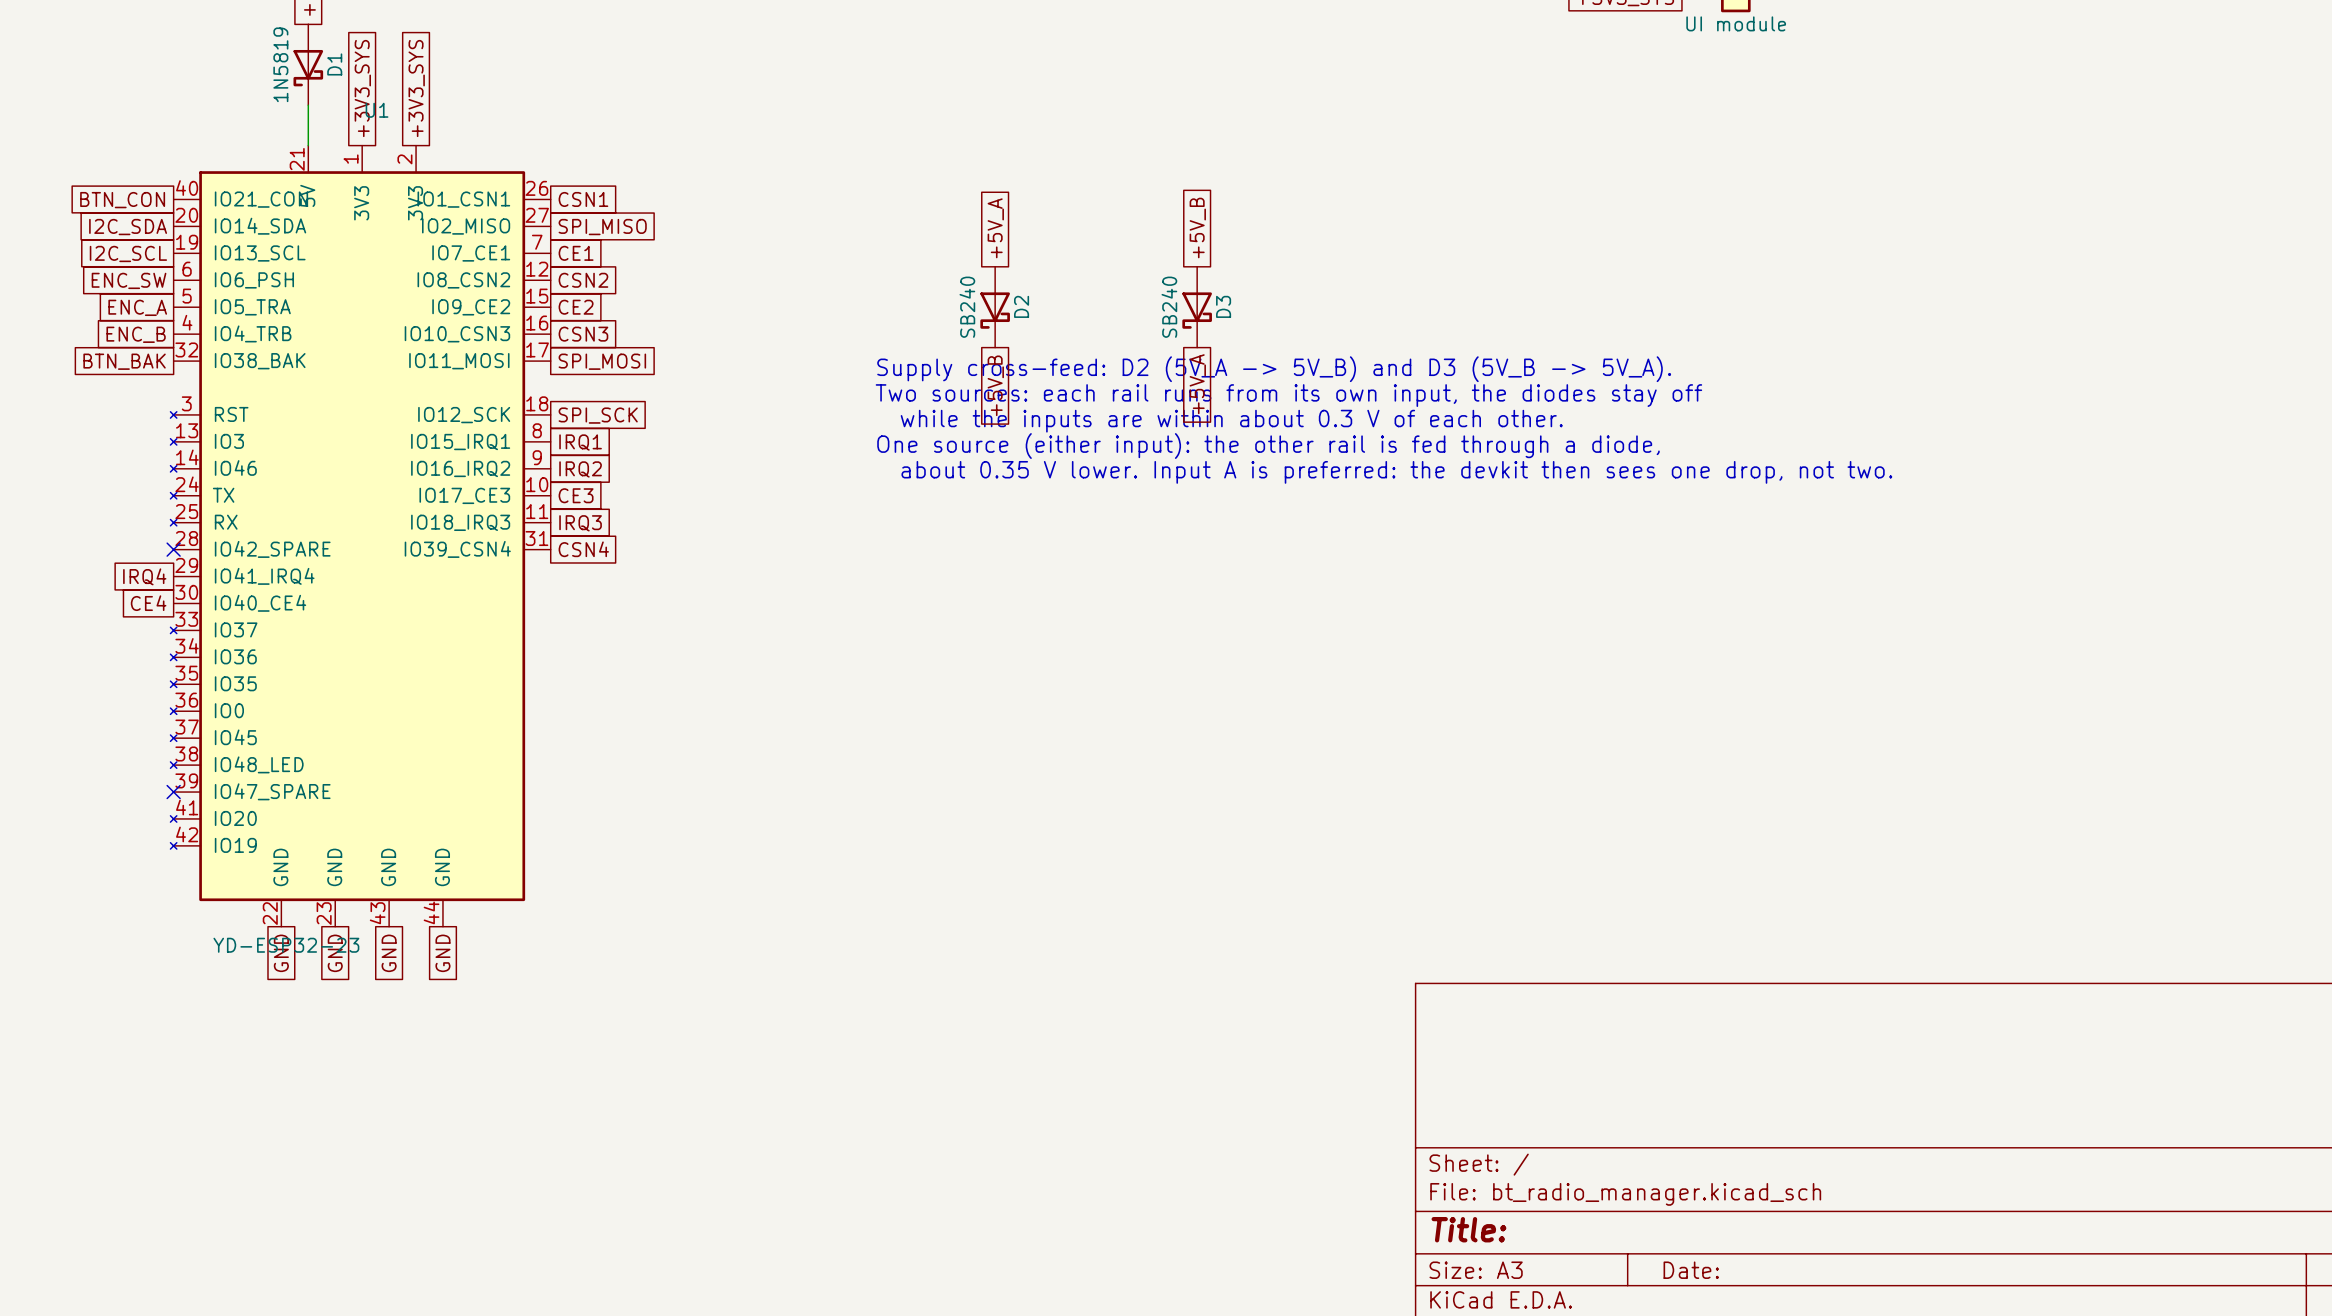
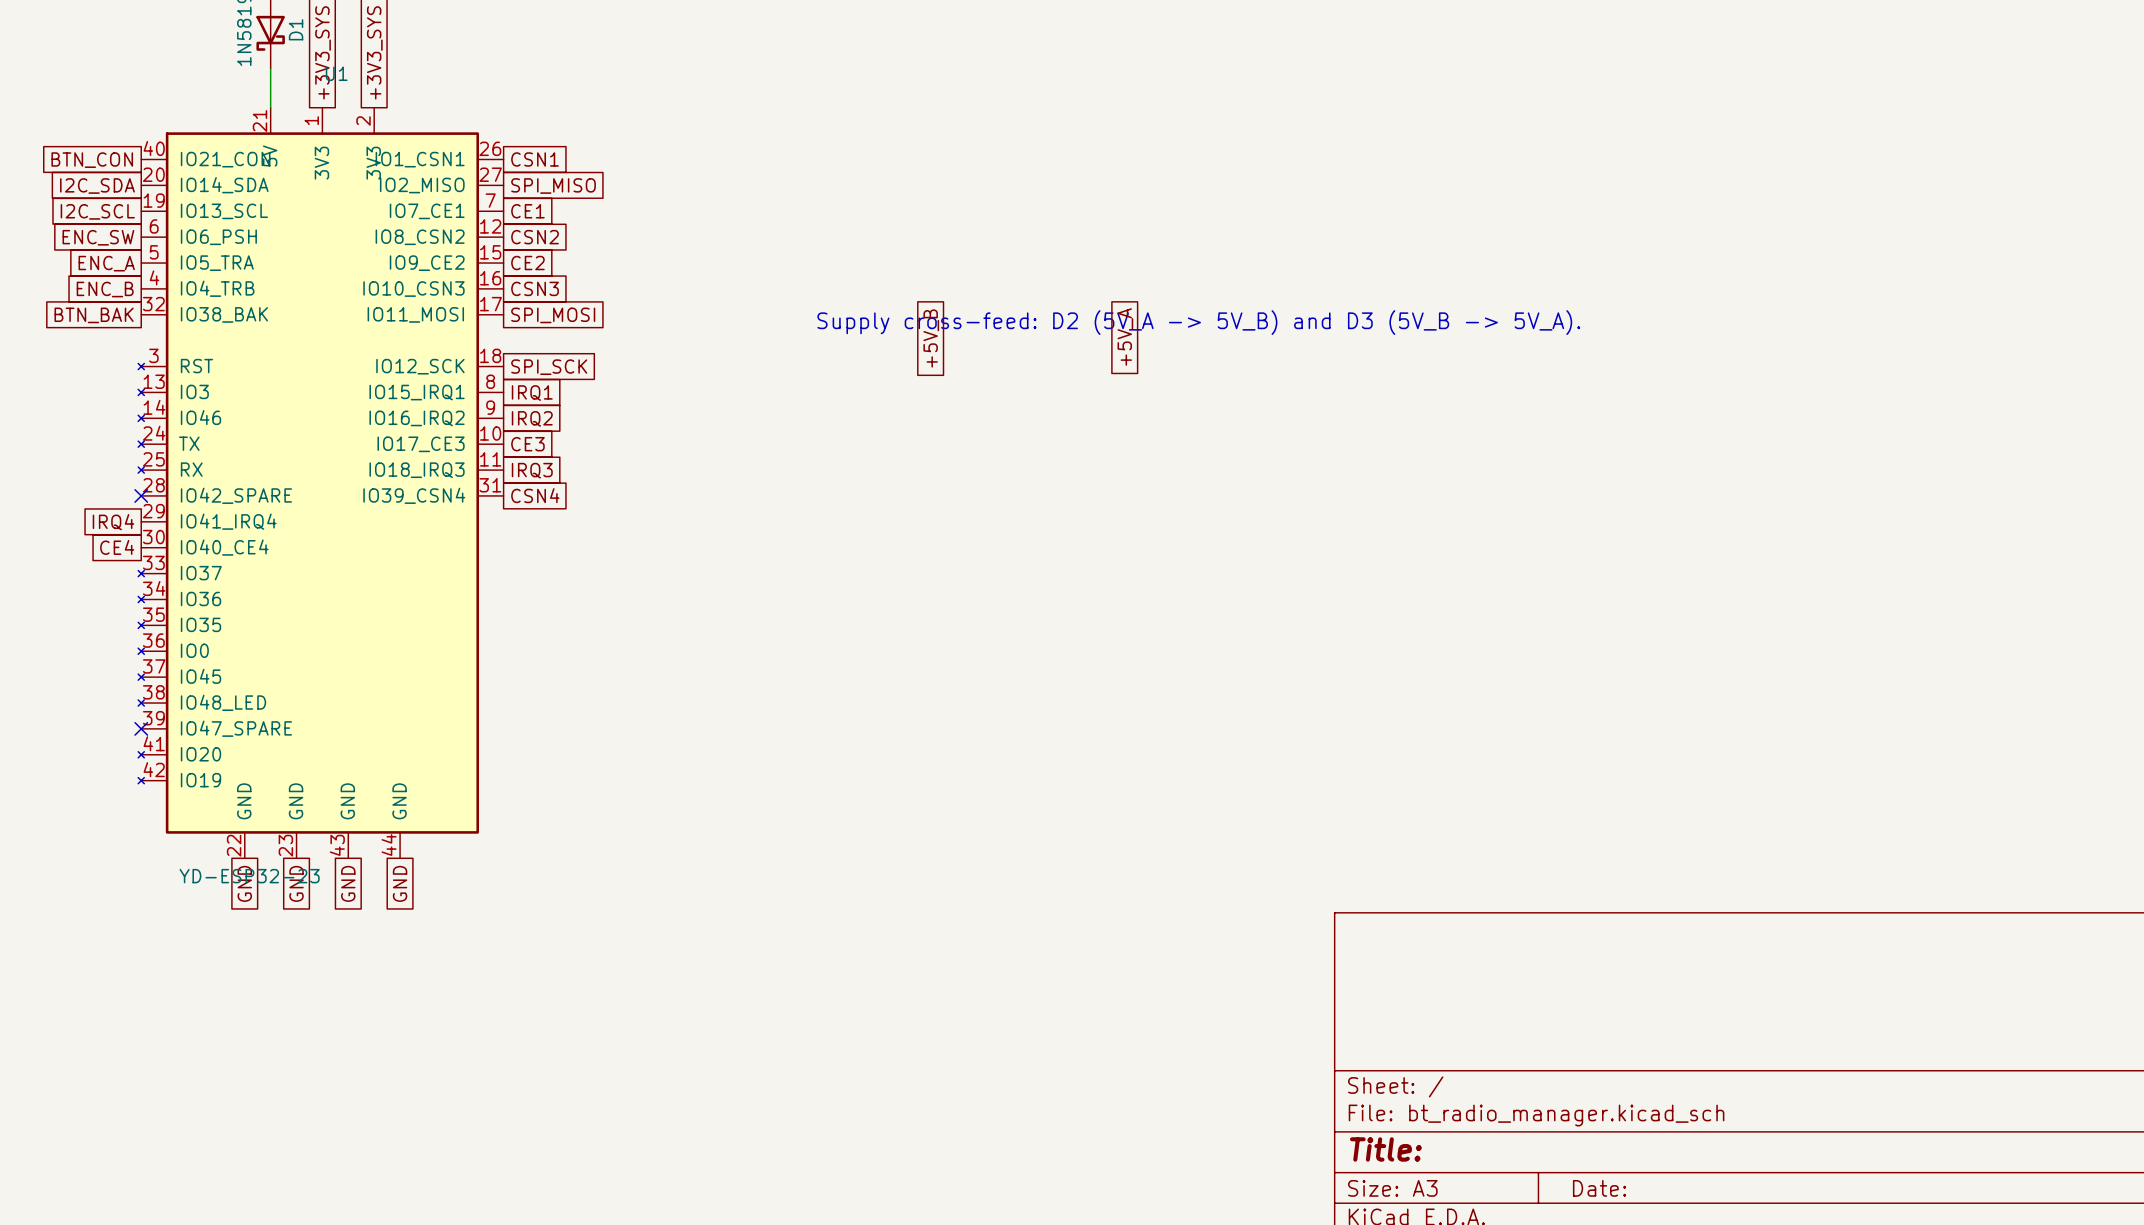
global label: +5V_B (1197, 227) -> none
global label: +5V_A (995, 228) -> none
D2: SB240 (995, 307) -> none
D3: SB240 (1197, 307) -> none
text: Two sources: each rail runs from its own input, the diodes stay off (1288, 395) -> none
text: while the inputs are within about 0.3 V of each other. (1231, 421) -> none
text: One source (either input): the other rail is fed through a diode, (1268, 446) -> none
text: about 0.35 V lower. Input A is preferred: the devkit then sees one drop, not two. (1396, 472) -> none

